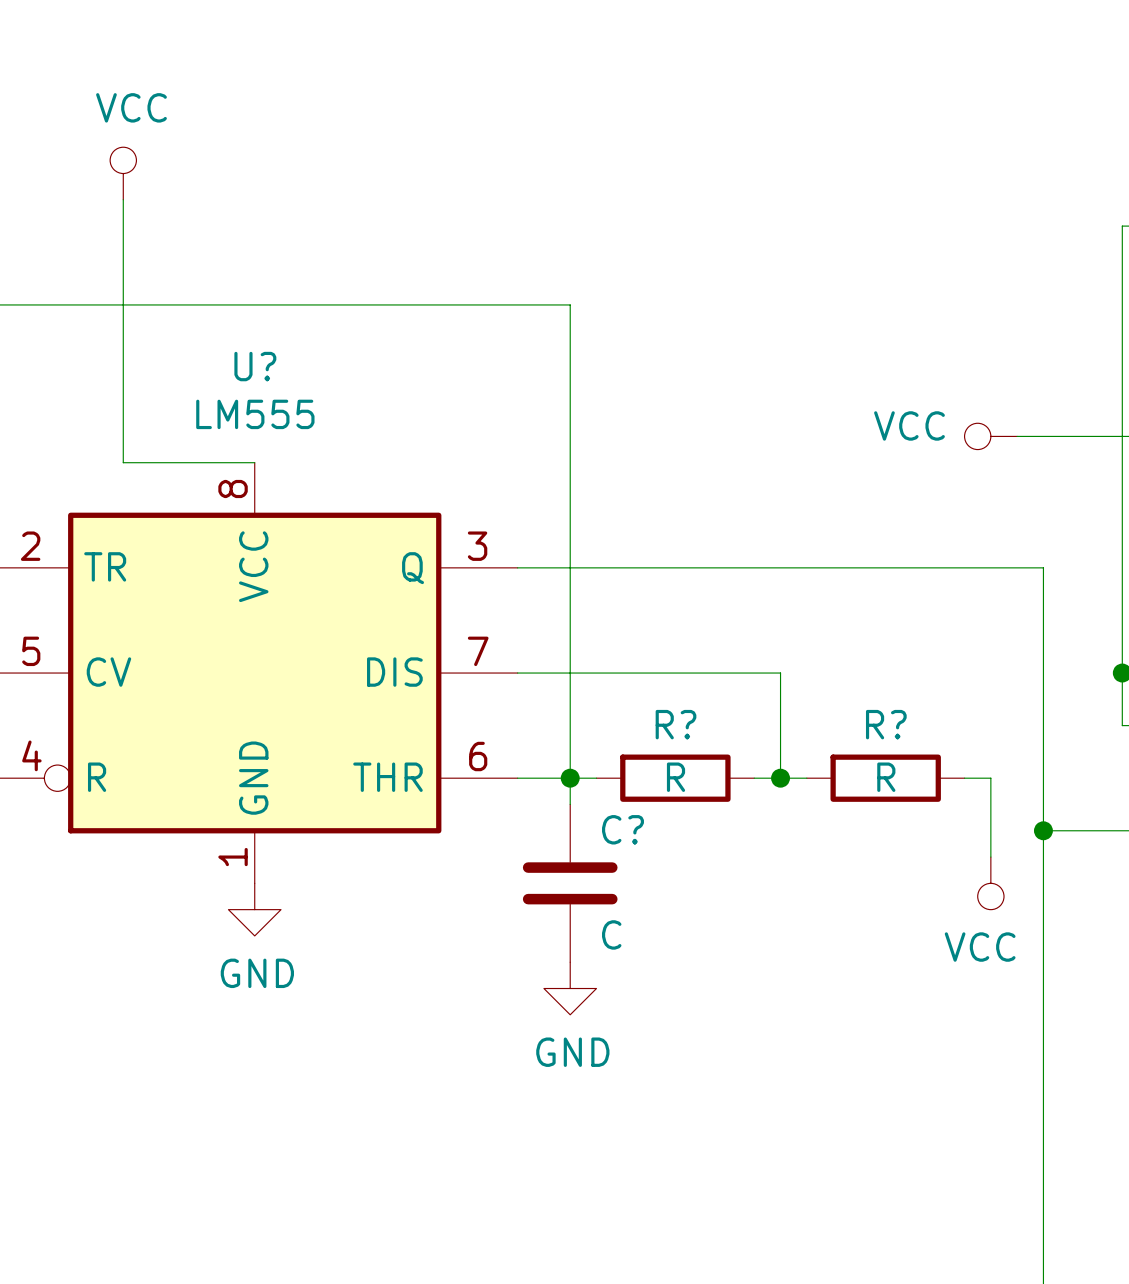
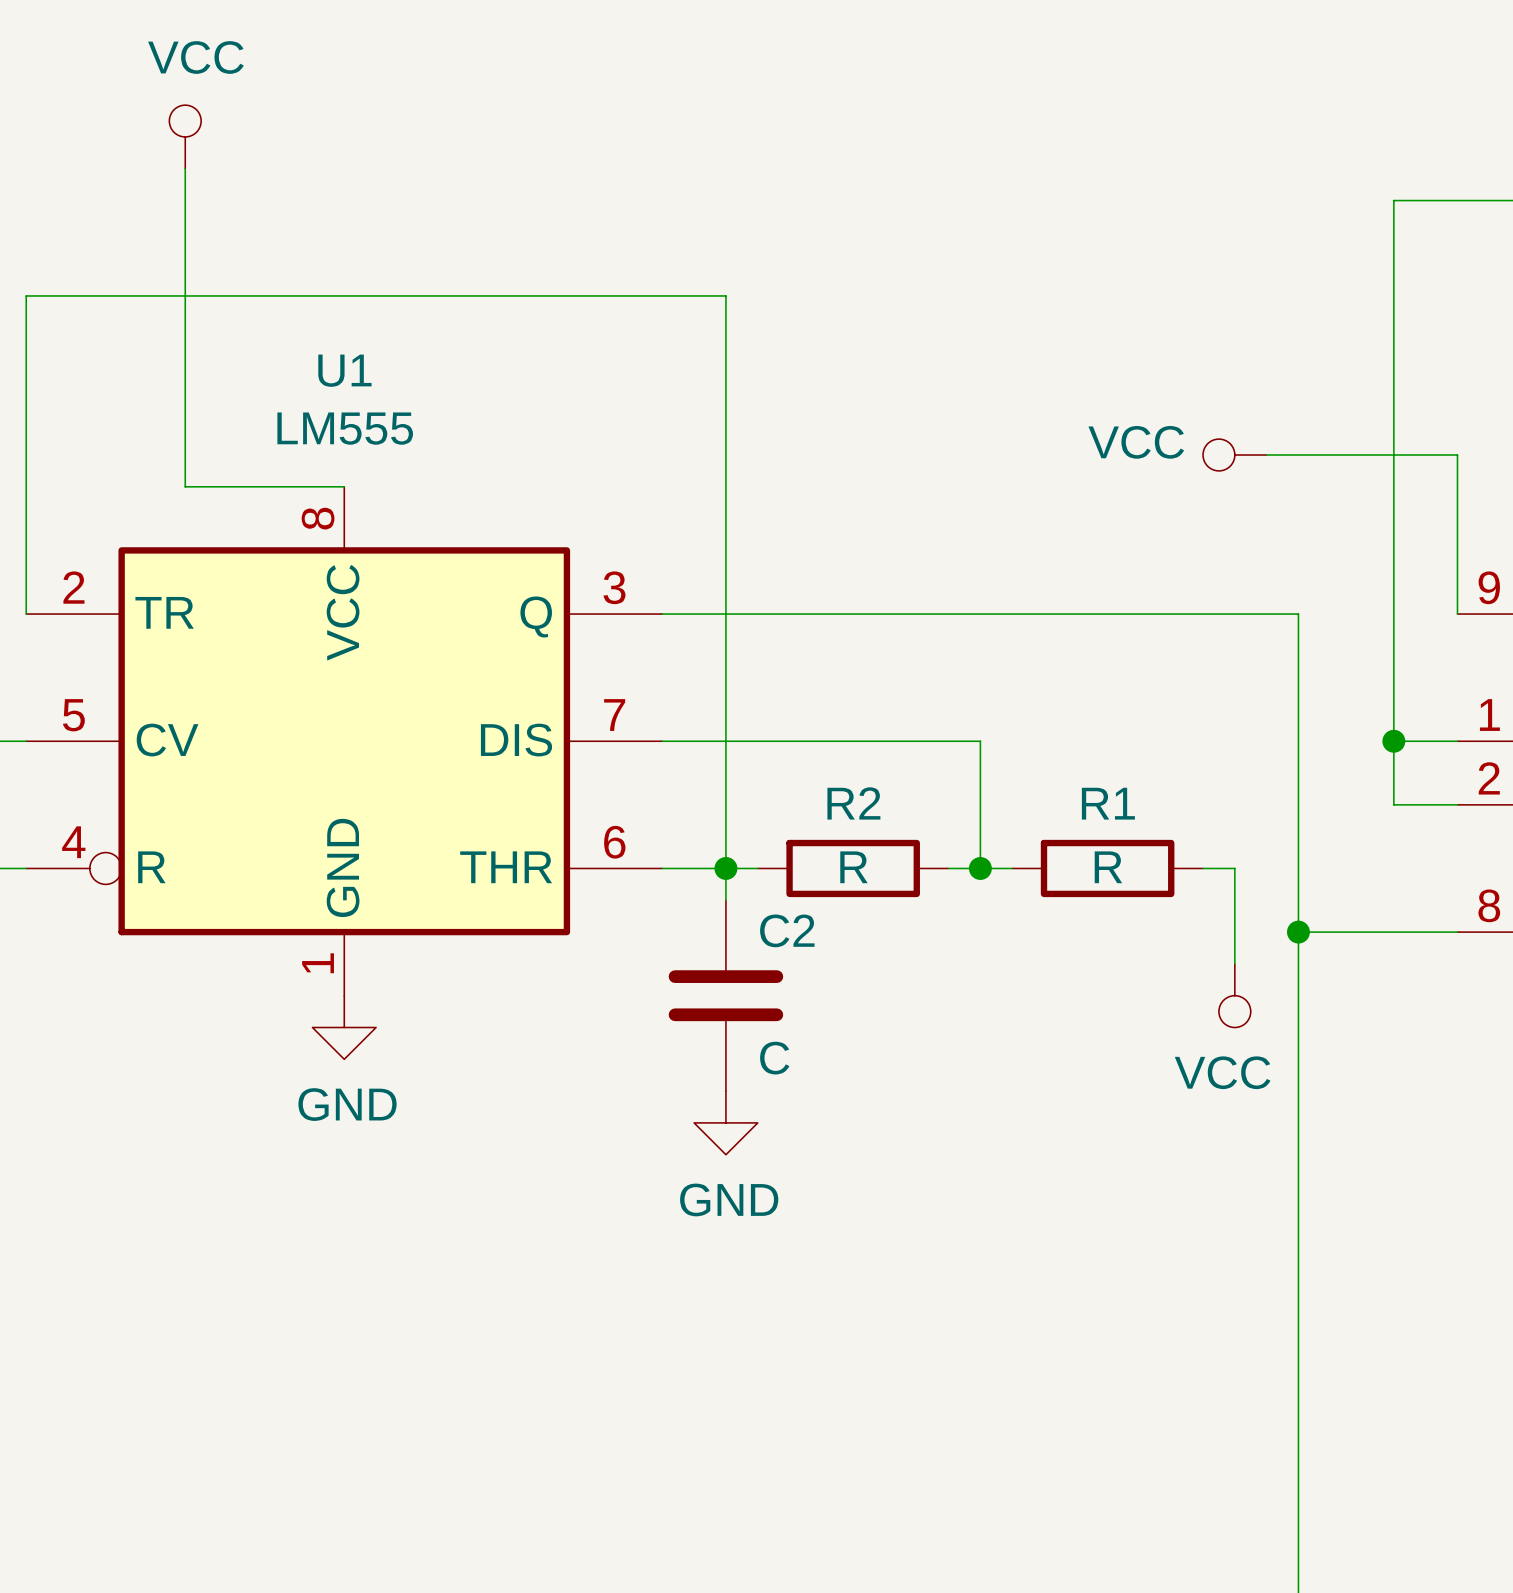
U? name: U? (255, 366) -> U1 (344, 370)
R? name: R? (676, 724) -> R2 (853, 803)
R? name: R? (886, 724) -> R1 (1108, 803)
C? name: C? (622, 829) -> C2 (787, 930)

